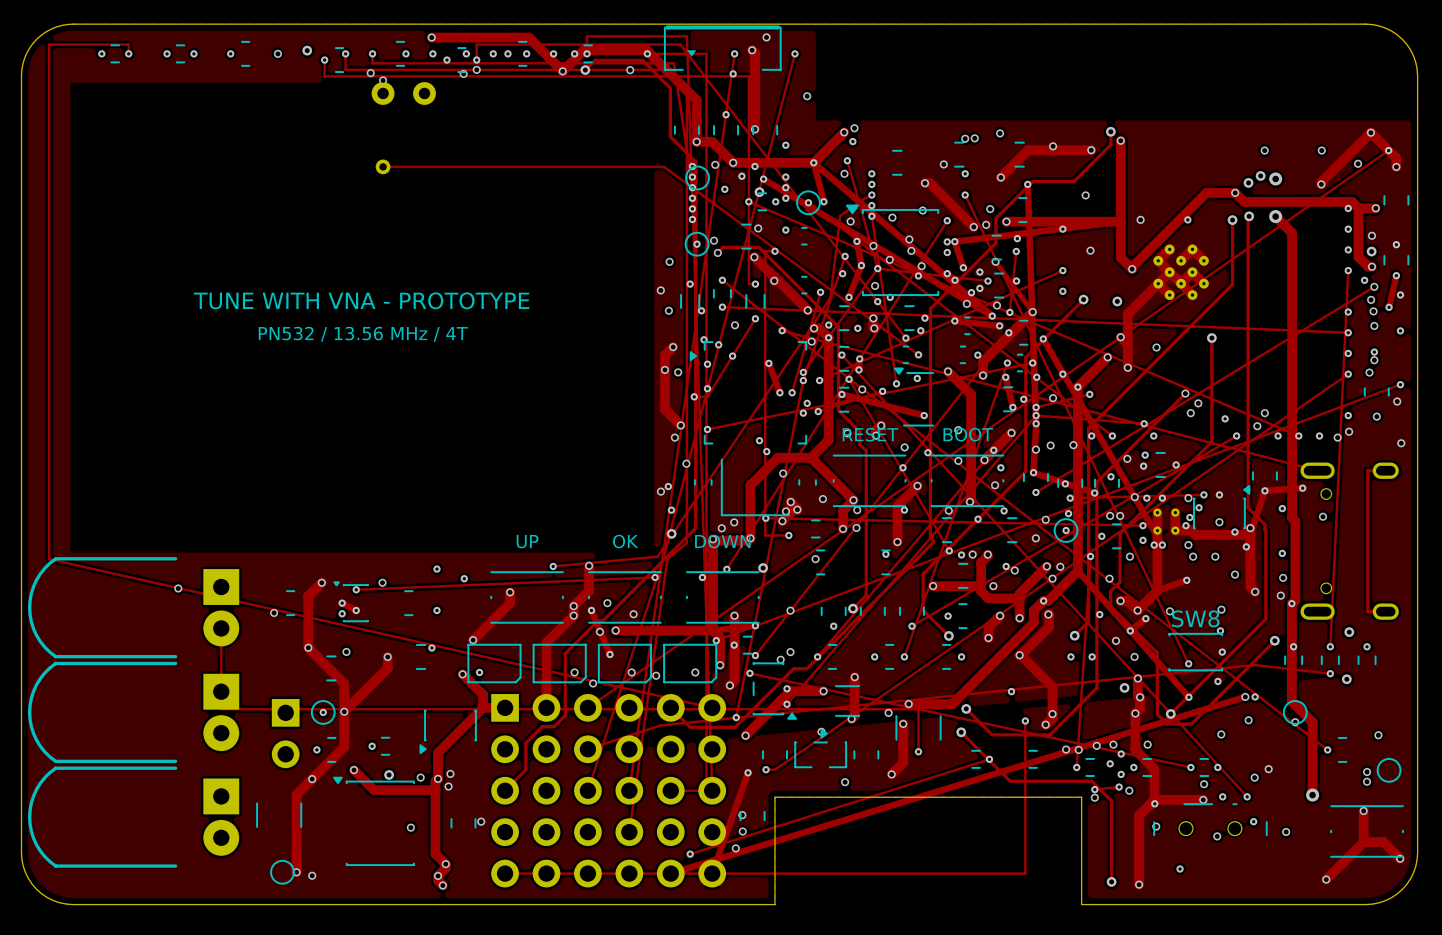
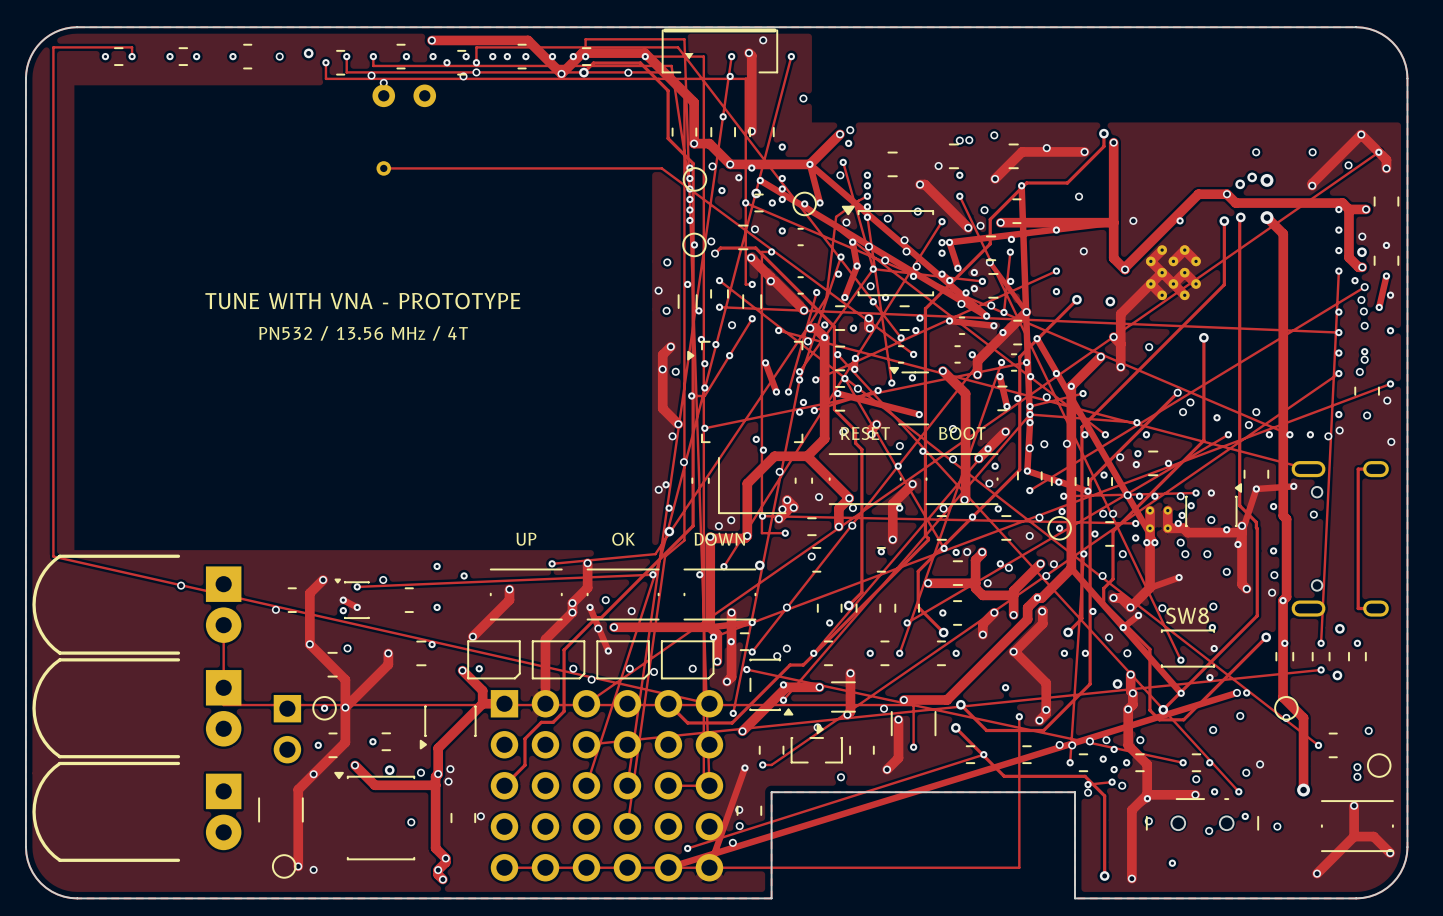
track: (1330, 673) (1254, 665) (660, 725) (587, 749) -> (1321, 669) (586, 744)

